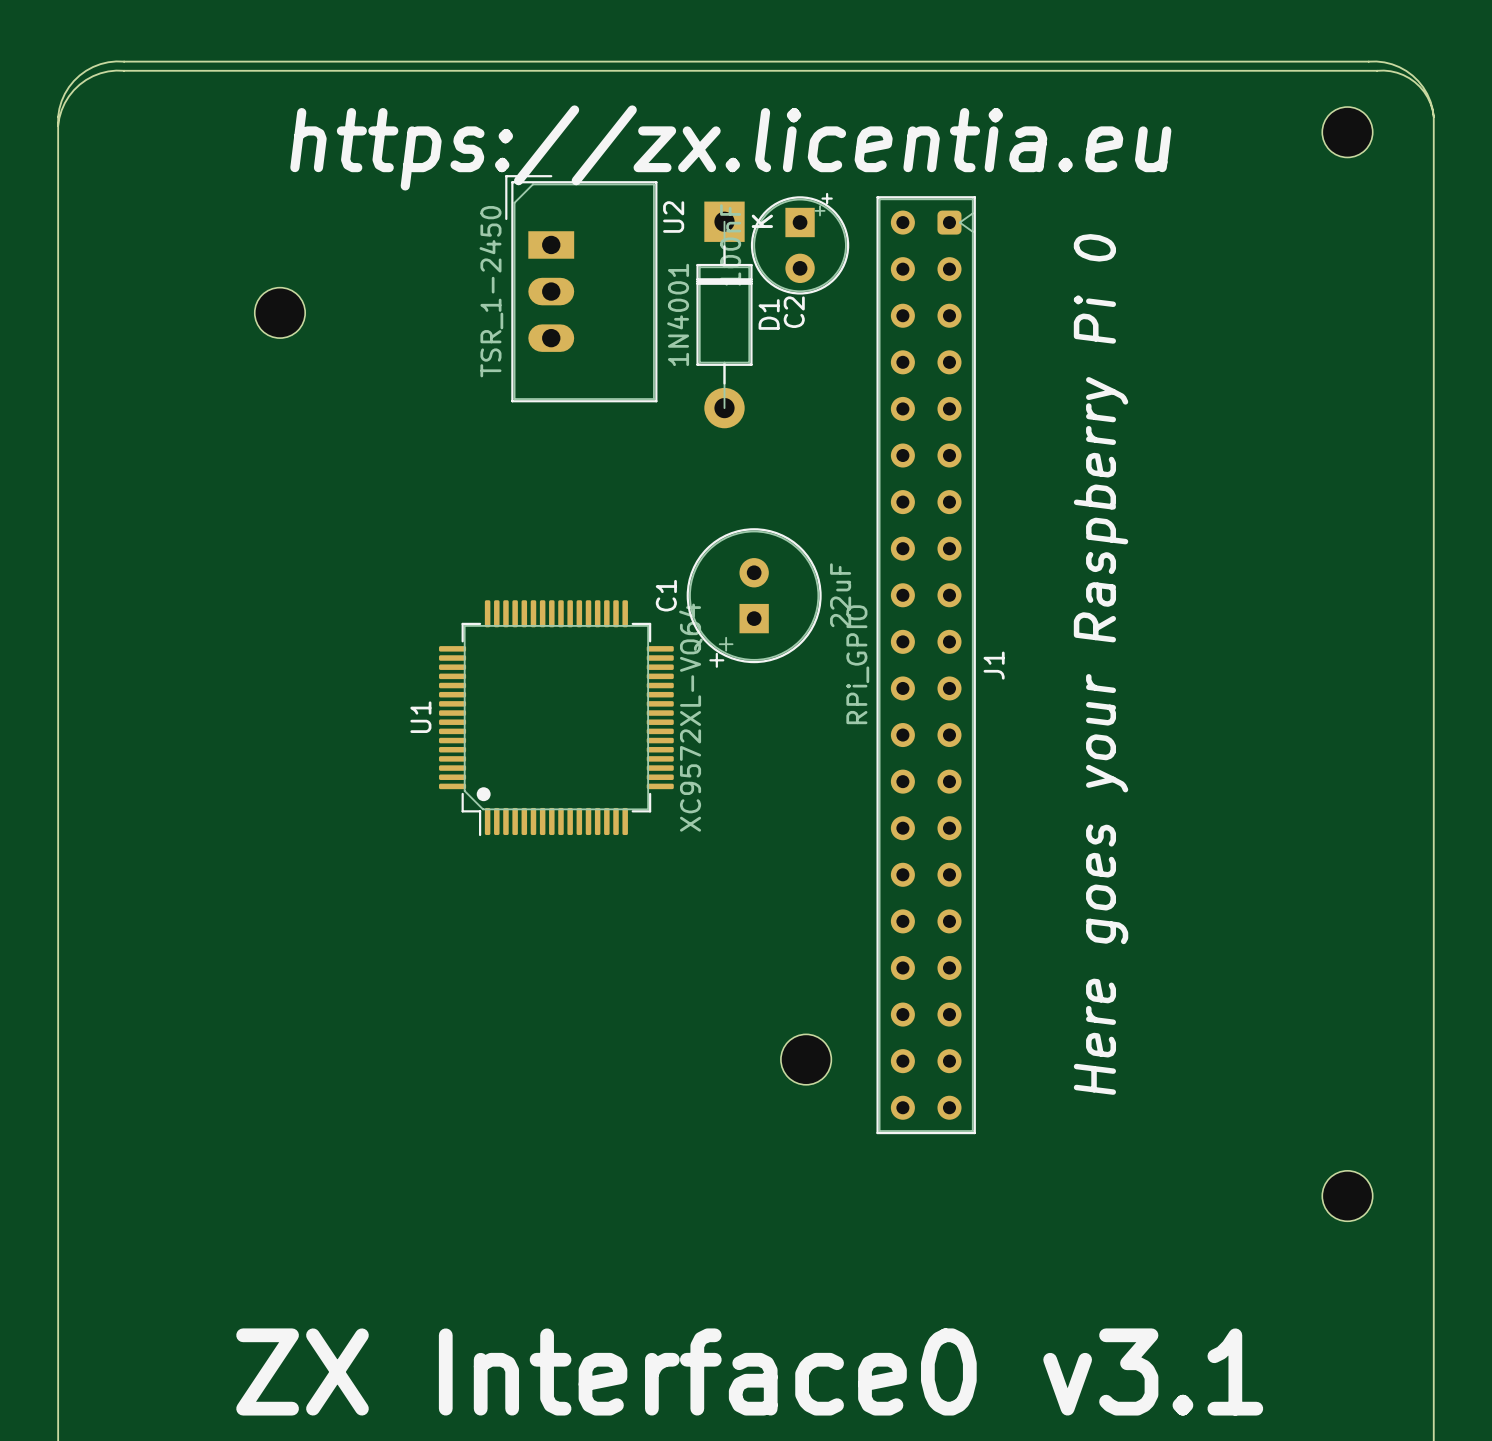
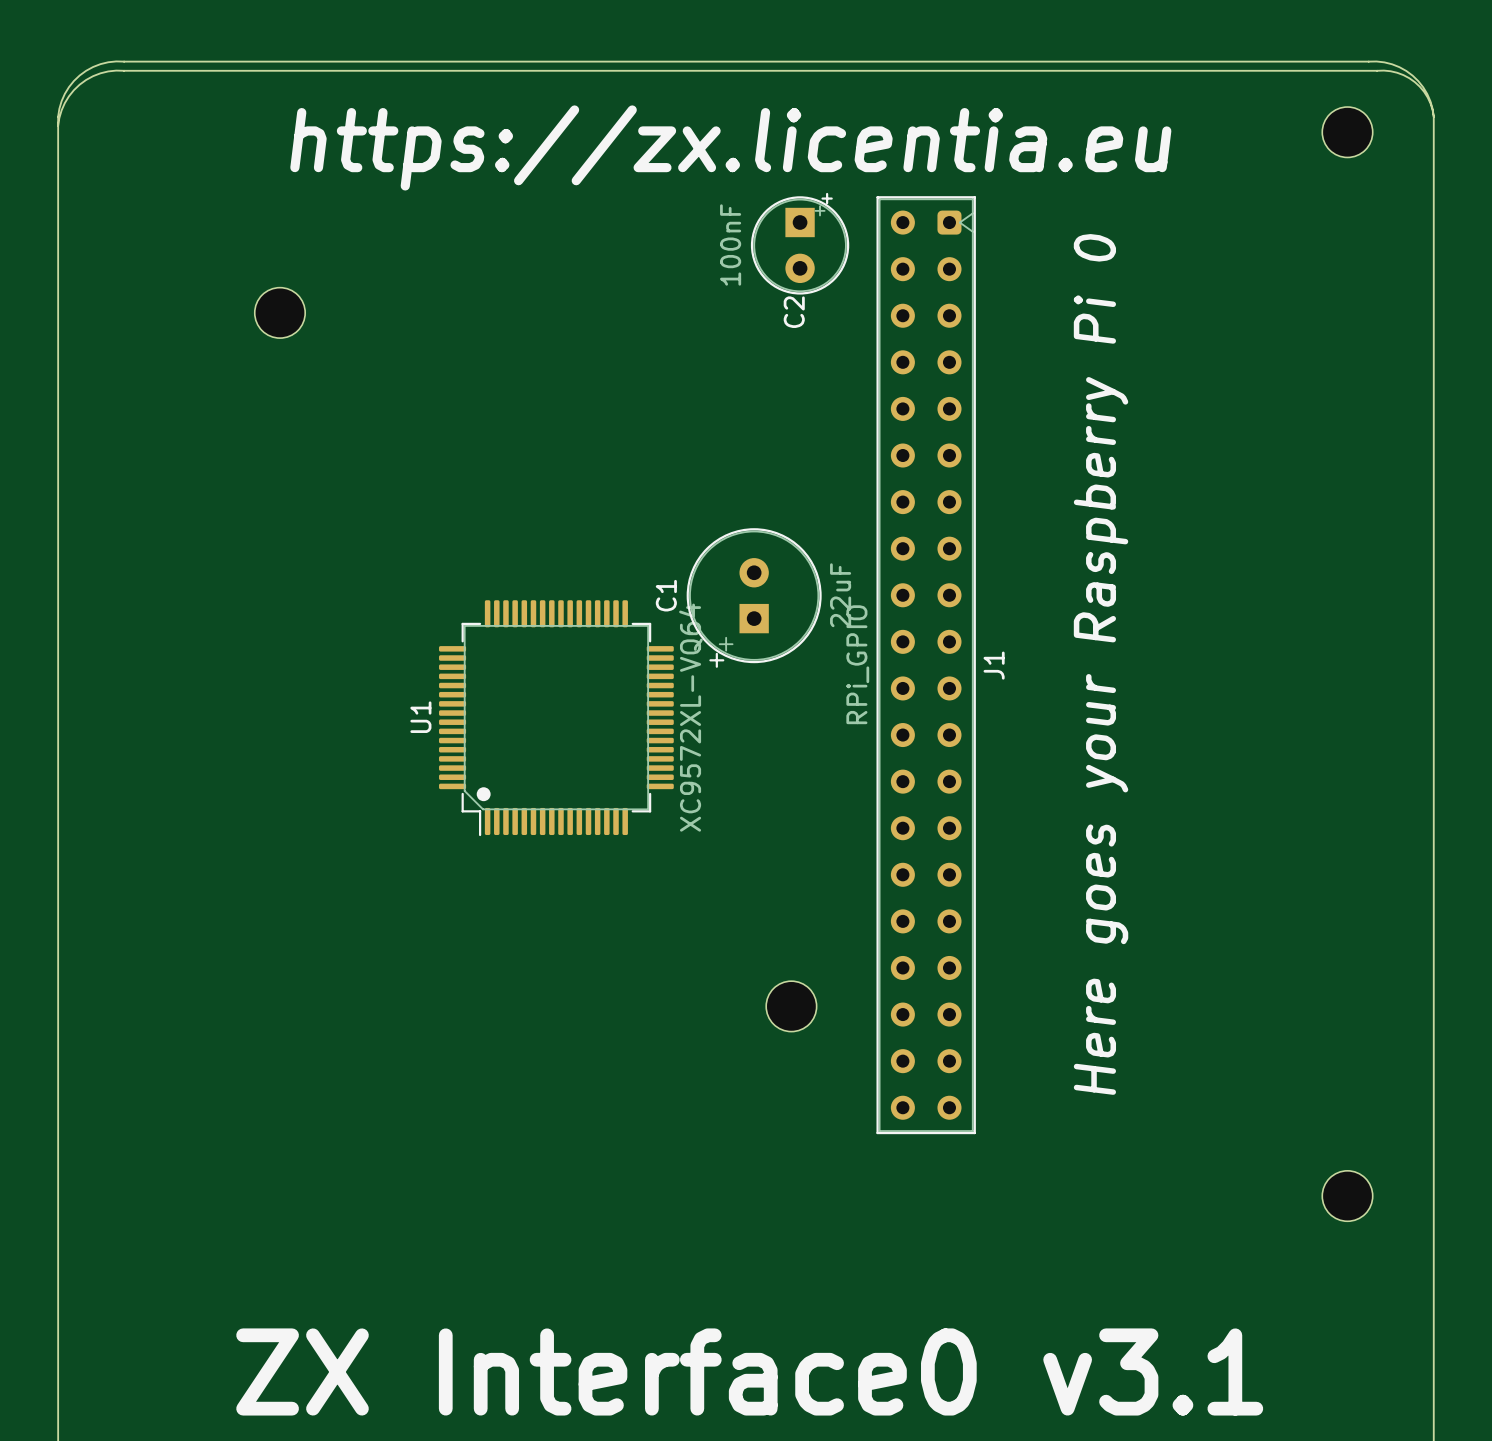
U2: TSR_1-2450 (581, 288) -> none
D1: 1N4001 (724, 314) -> none
part position: (806, 1059) -> (791, 1006)

